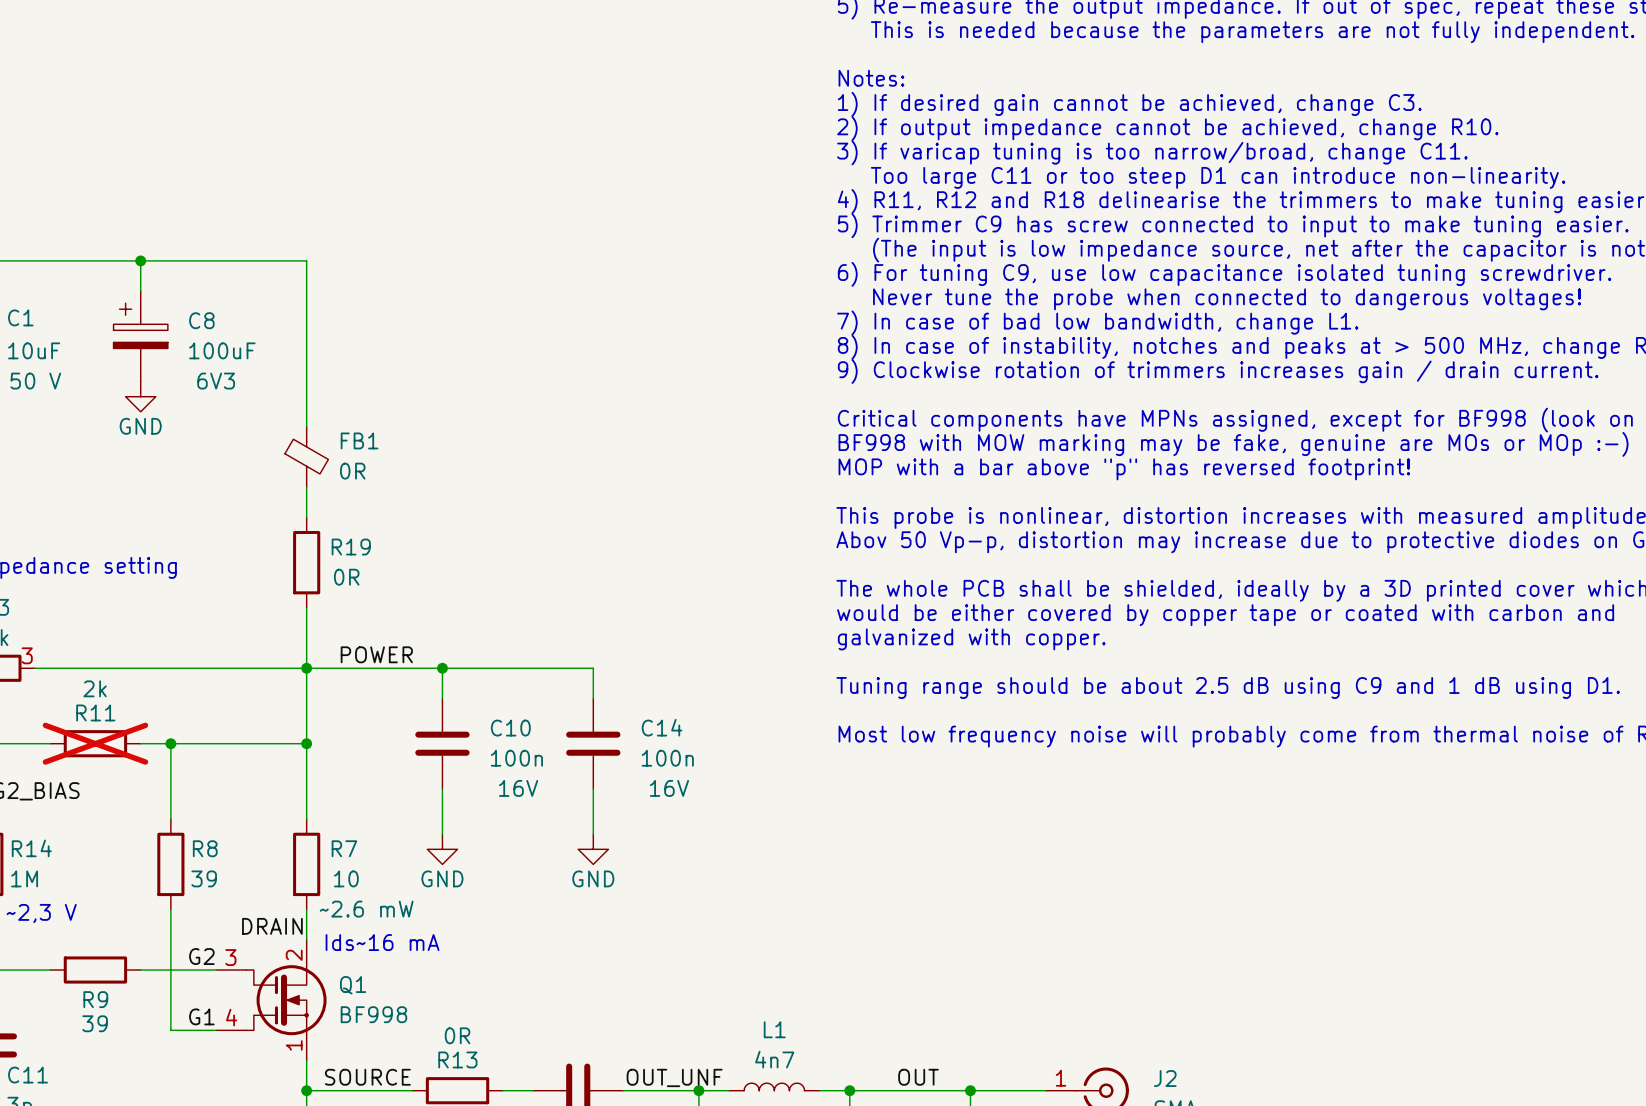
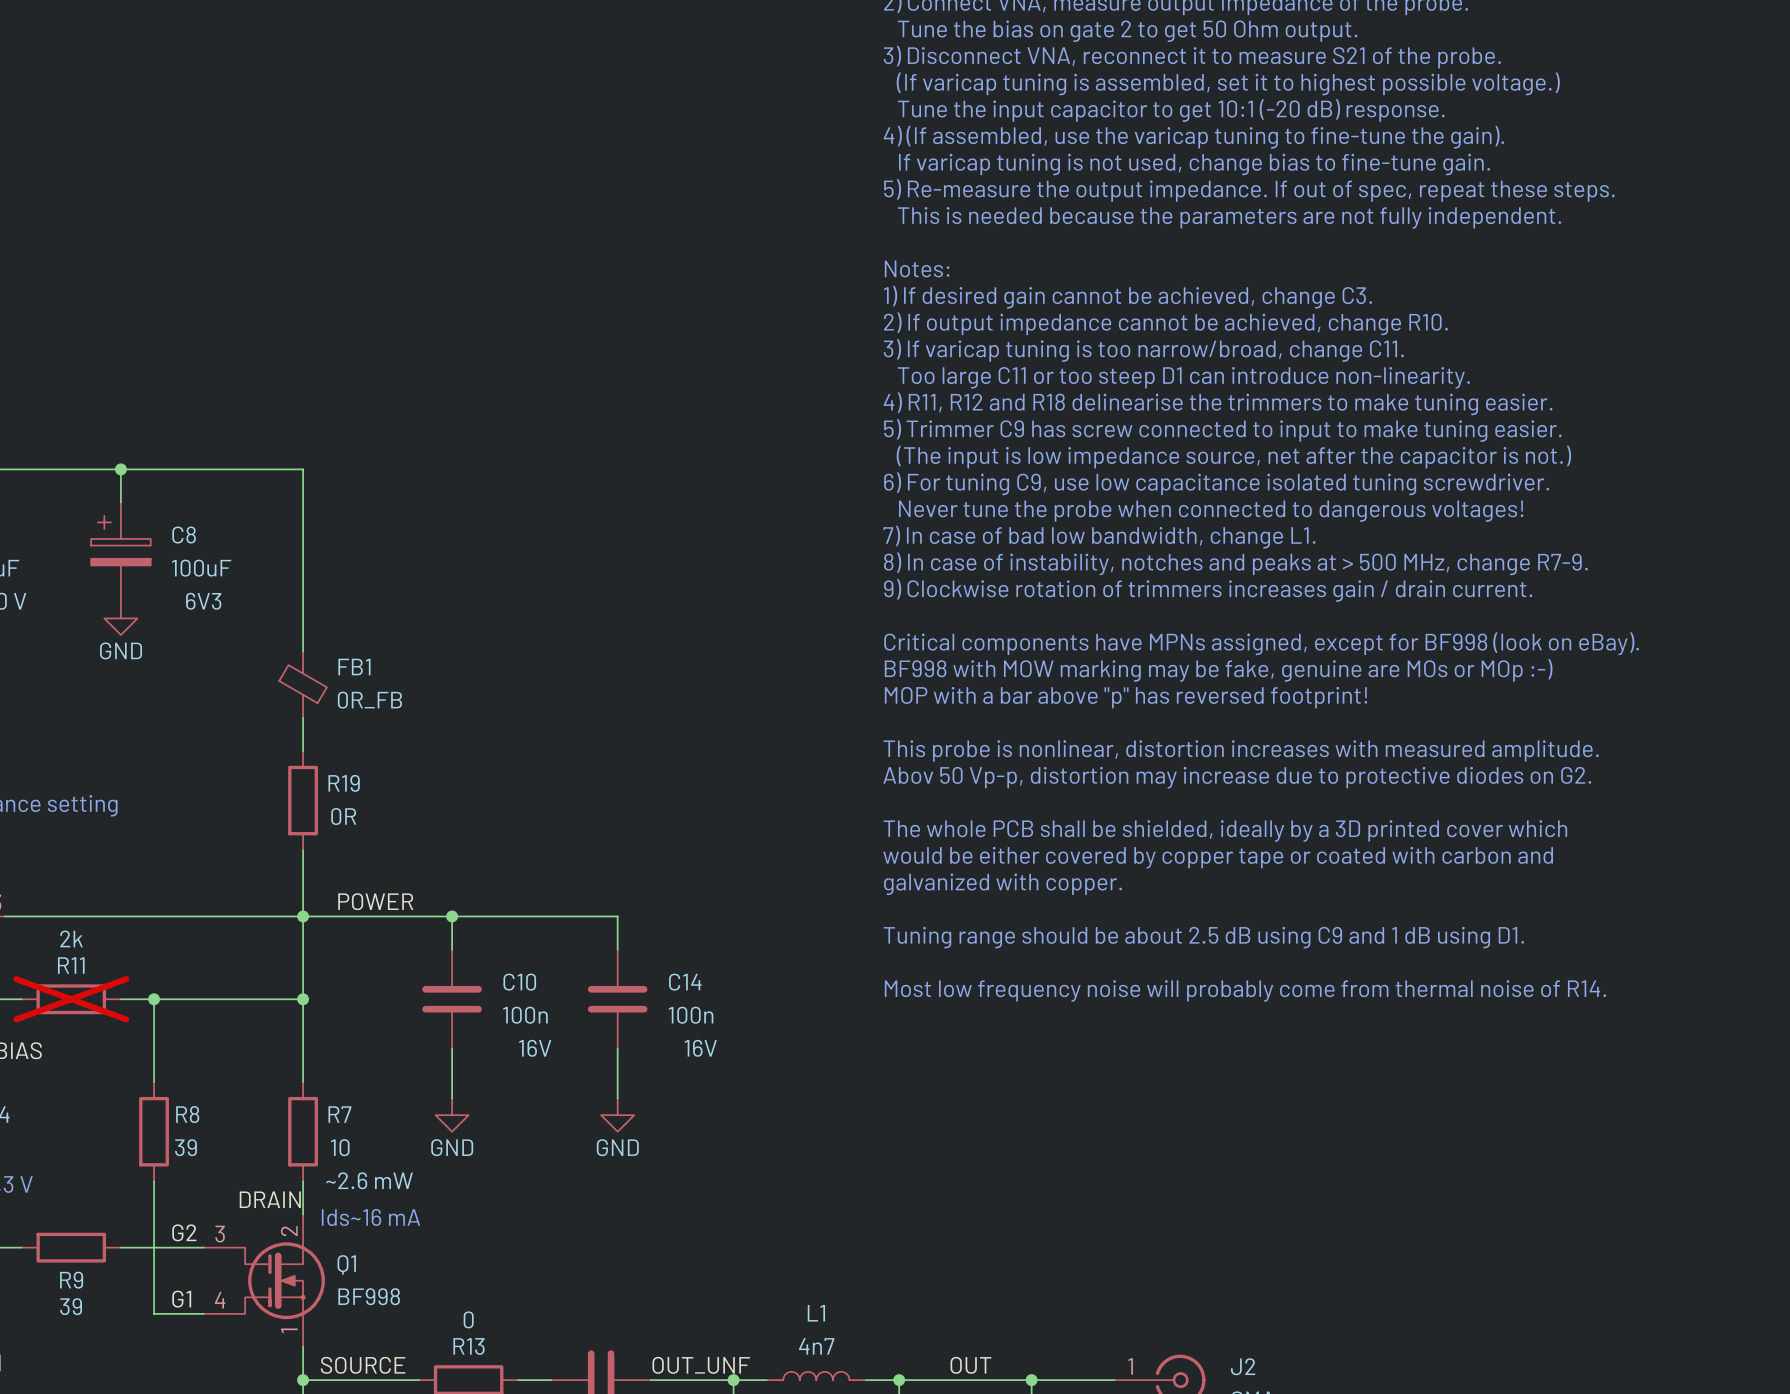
FB1 value: 0R (352, 471) -> 0R_FB (369, 700)
R13 value: 0R (457, 1035) -> 0 (468, 1319)

